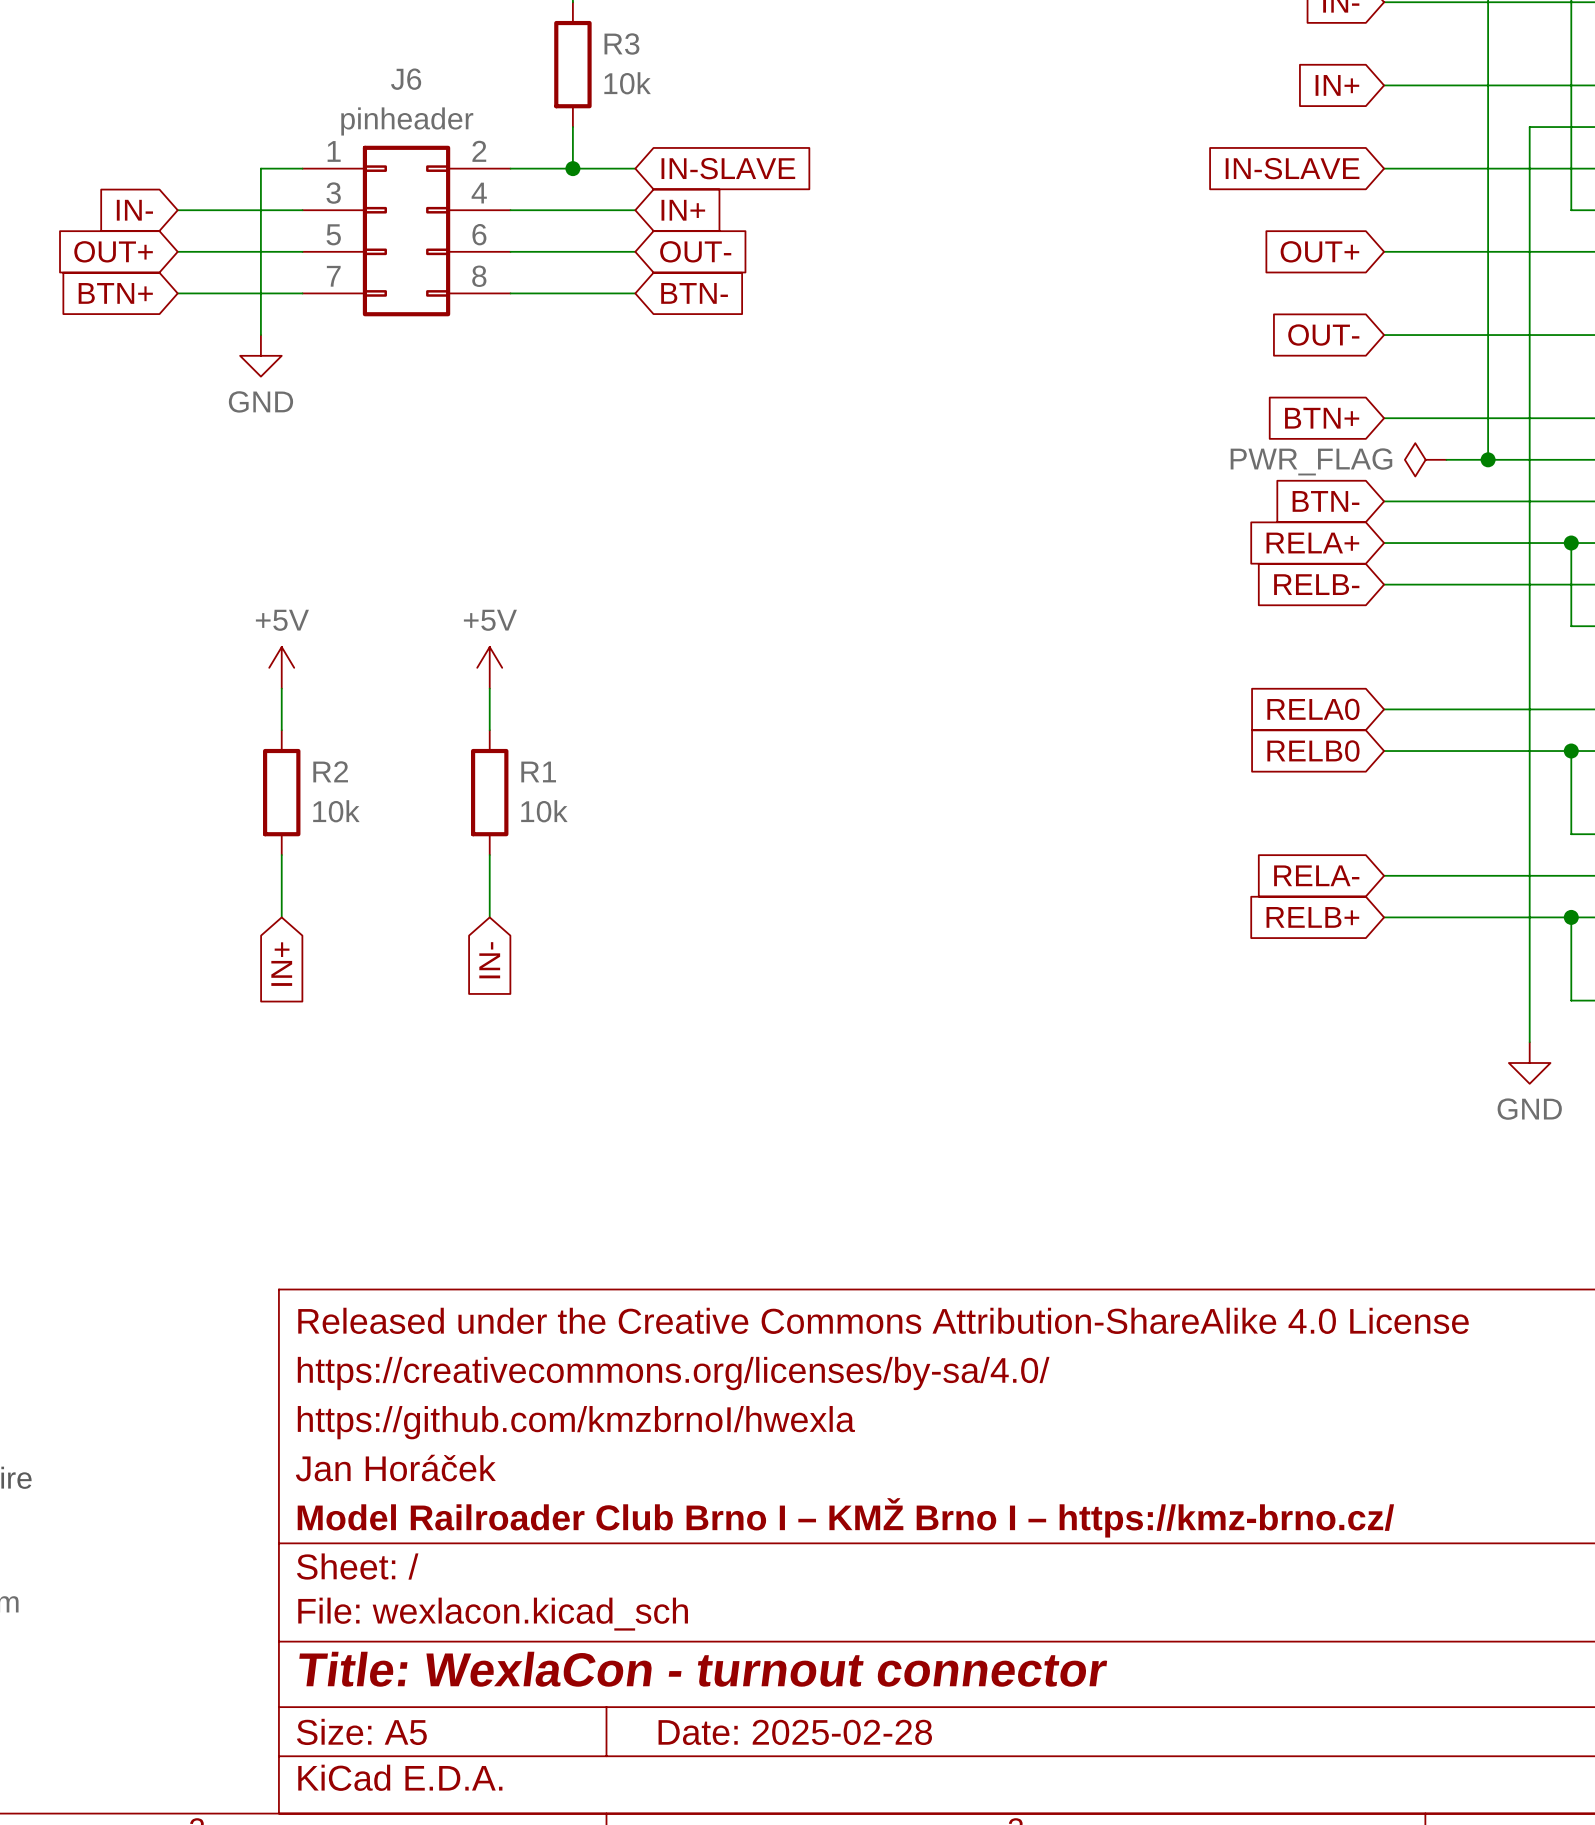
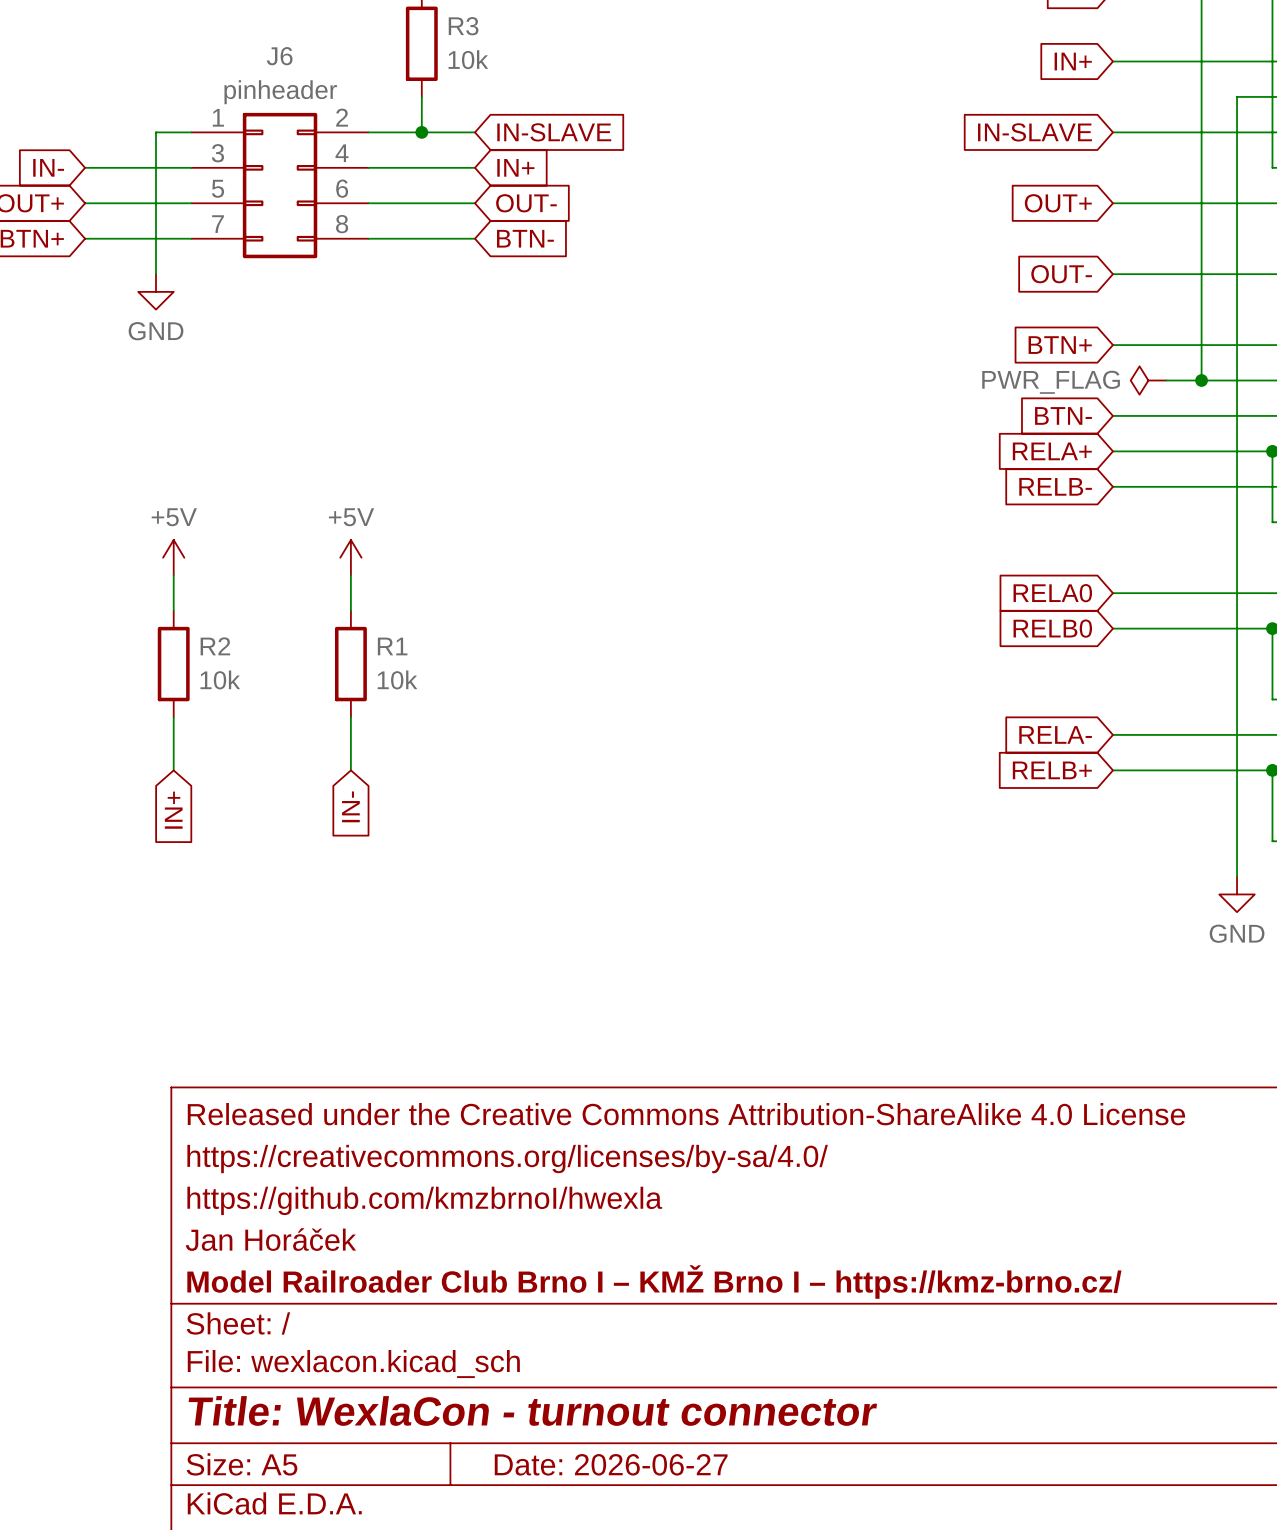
title block: Date: 2025-02-28 (795, 1732) -> Date: 2026-06-27 (611, 1464)

